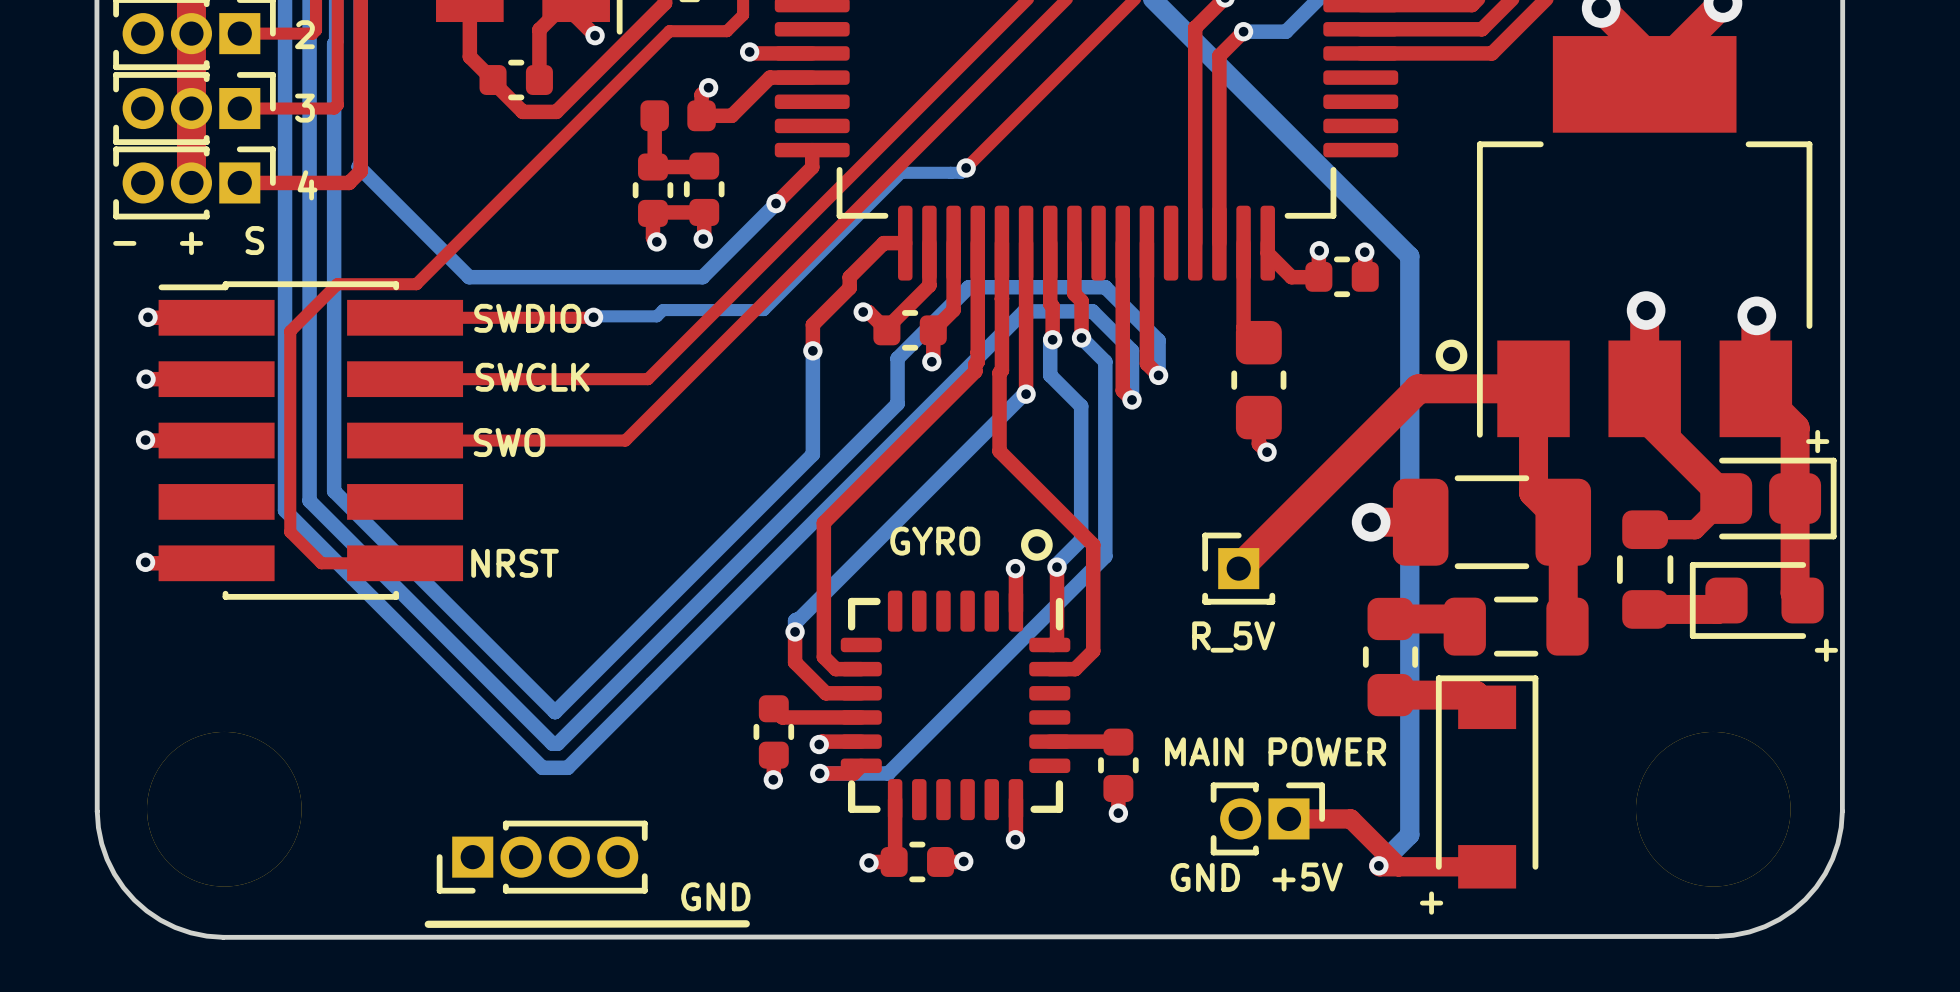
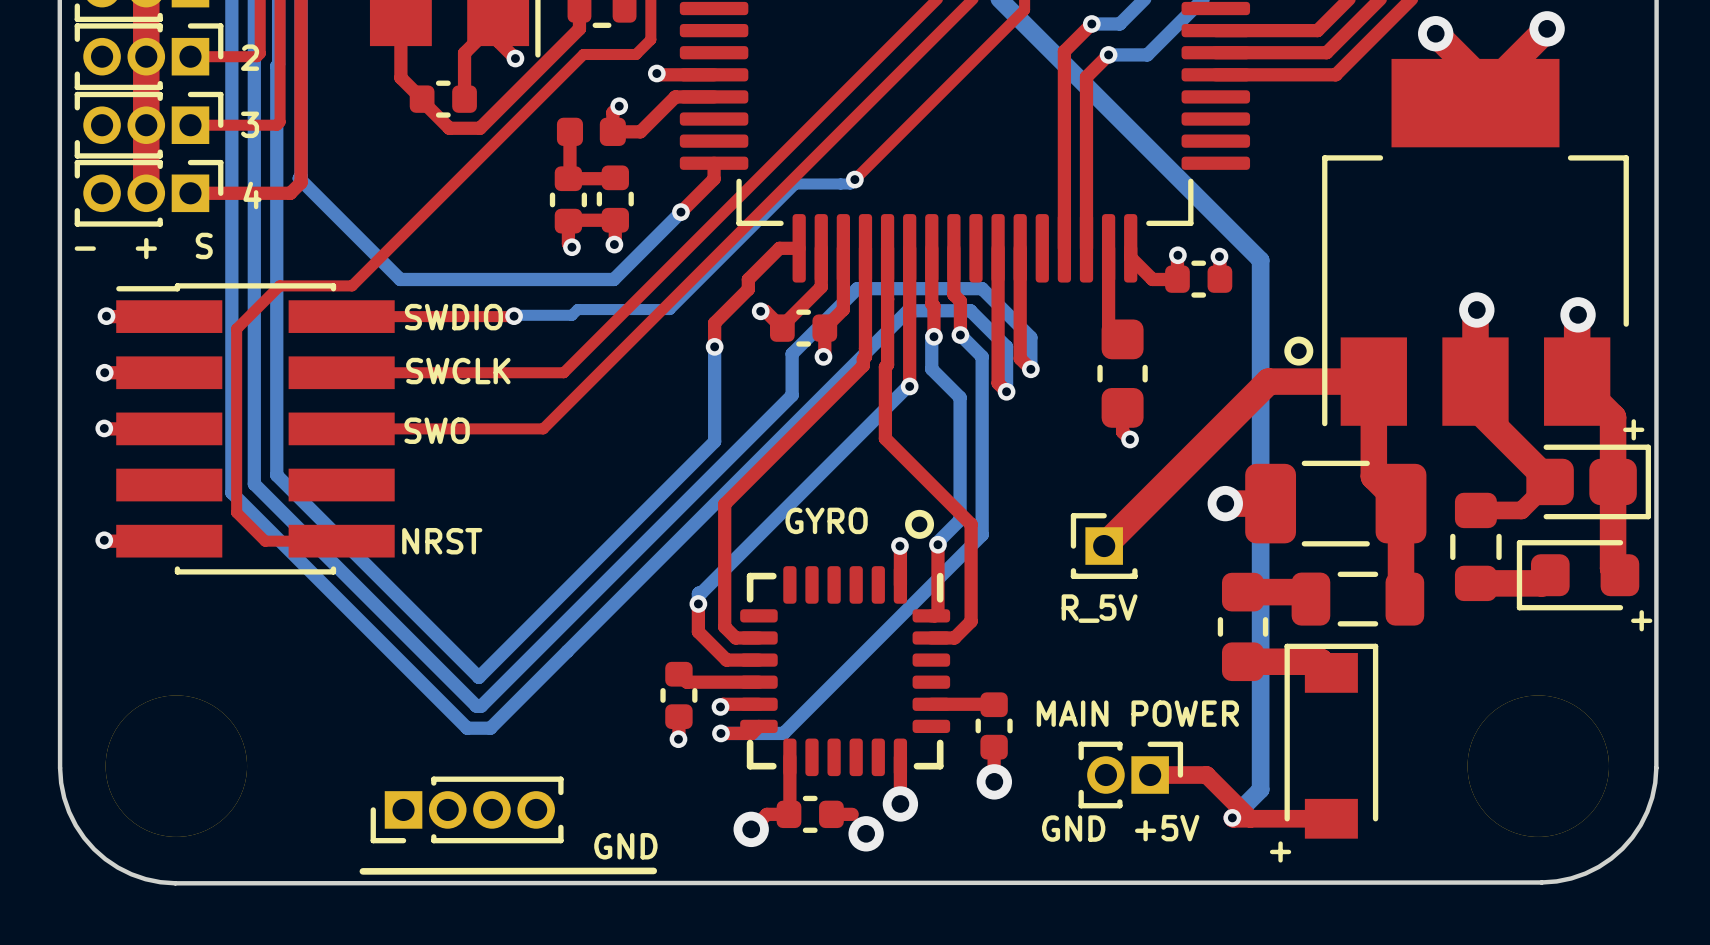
via size: [1108, 803, 1129, 823] -> [976, 764, 1013, 800]
via size: [1005, 830, 1026, 850] -> [882, 786, 919, 822]
via size: [954, 851, 974, 872] -> [848, 816, 884, 852]
via size: [859, 853, 879, 873] -> [733, 811, 769, 848]

